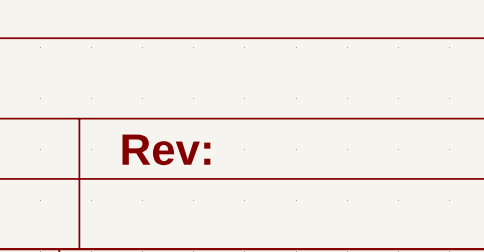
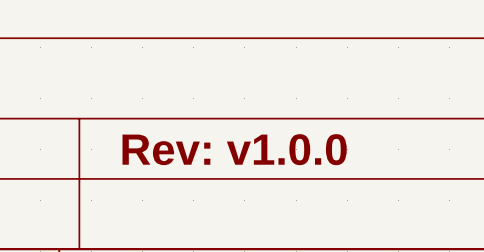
title block: Rev: (166, 149) -> Rev: v1.0.0 (234, 149)

